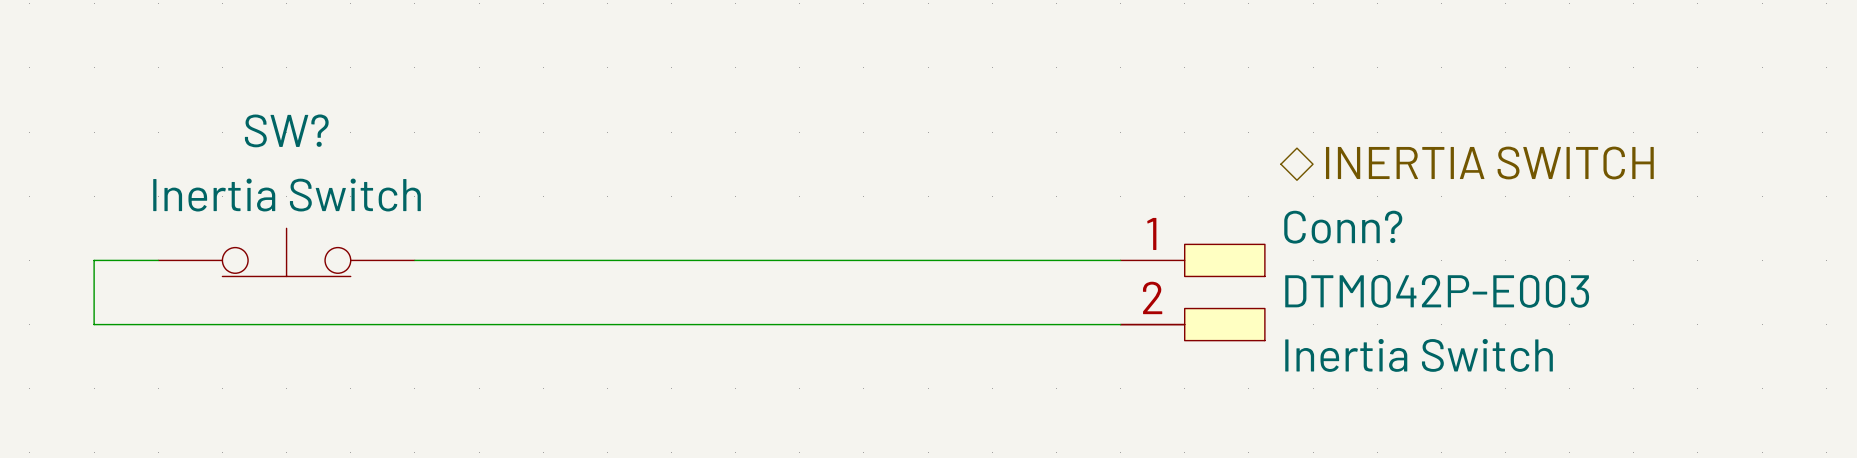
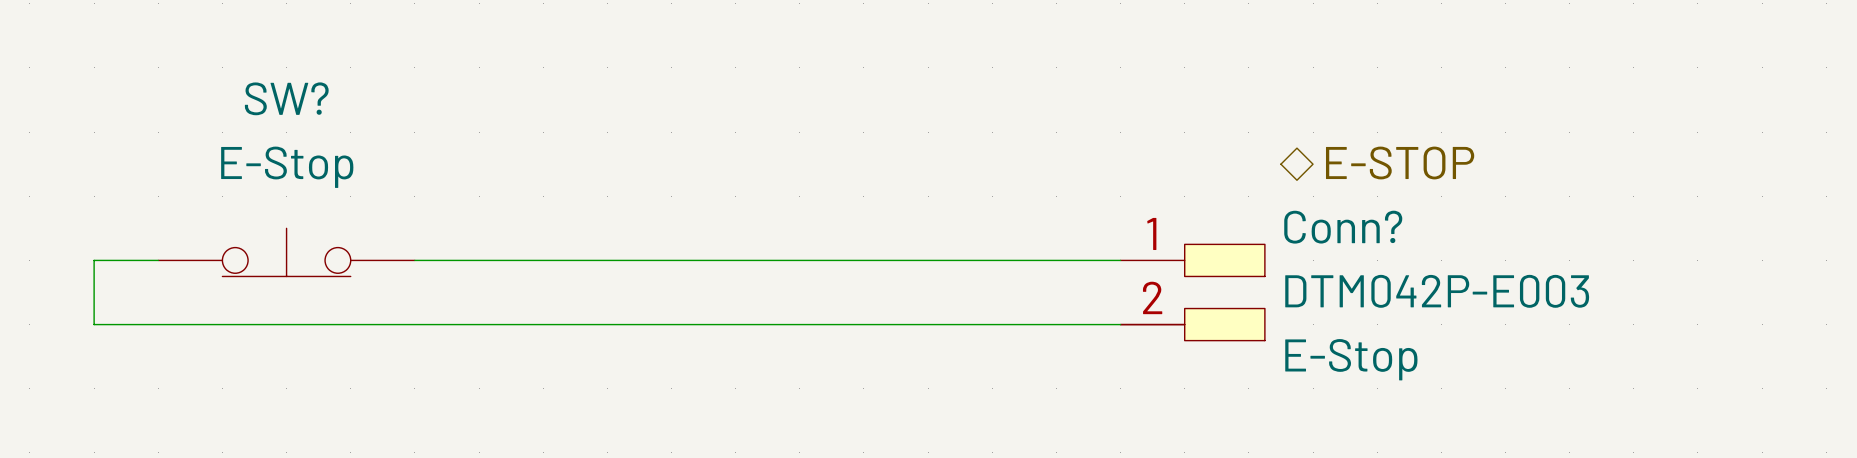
SW? name position: SW? (286, 130) -> SW? (286, 98)
hierarchical label: INERTIA SWITCH (1489, 163) -> E-STOP (1400, 162)
SW? value: Inertia Switch (287, 195) -> E-Stop (287, 167)
Conn? text: Inertia Switch (1419, 355) -> E-Stop (1351, 359)

